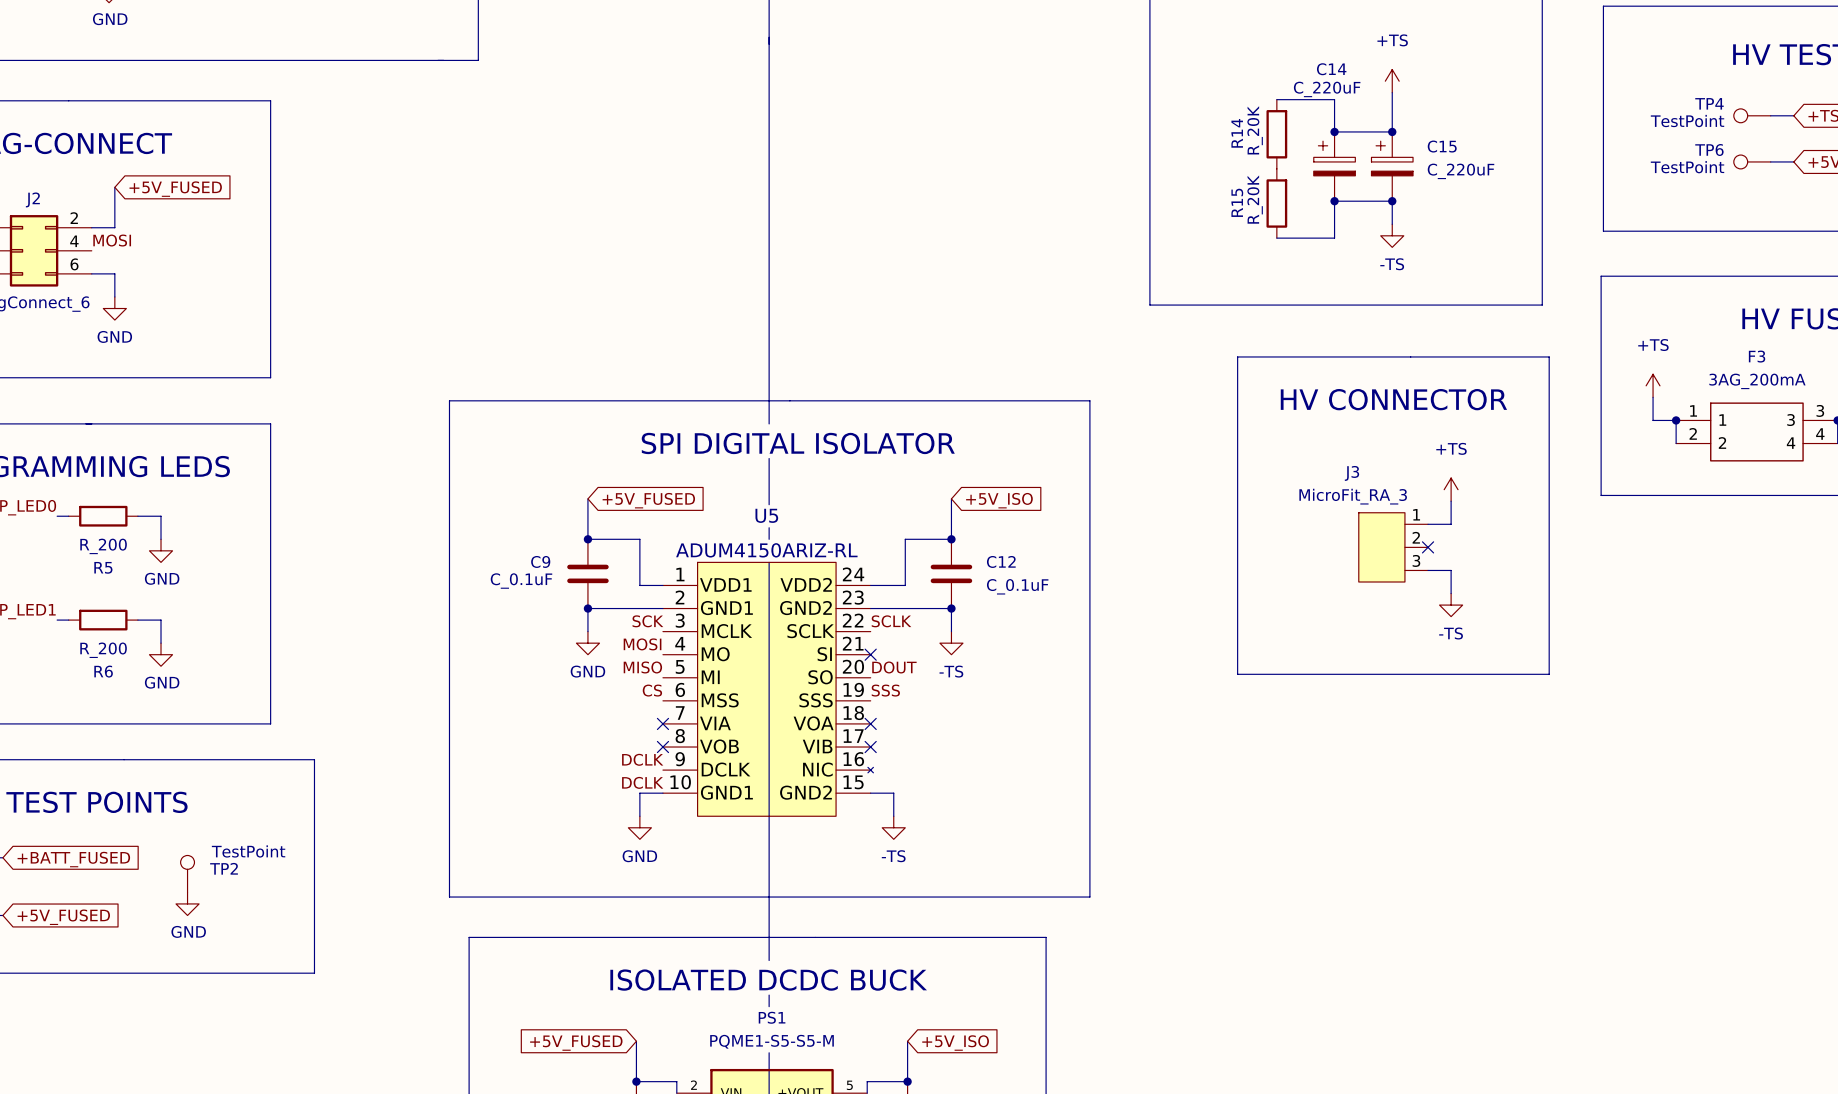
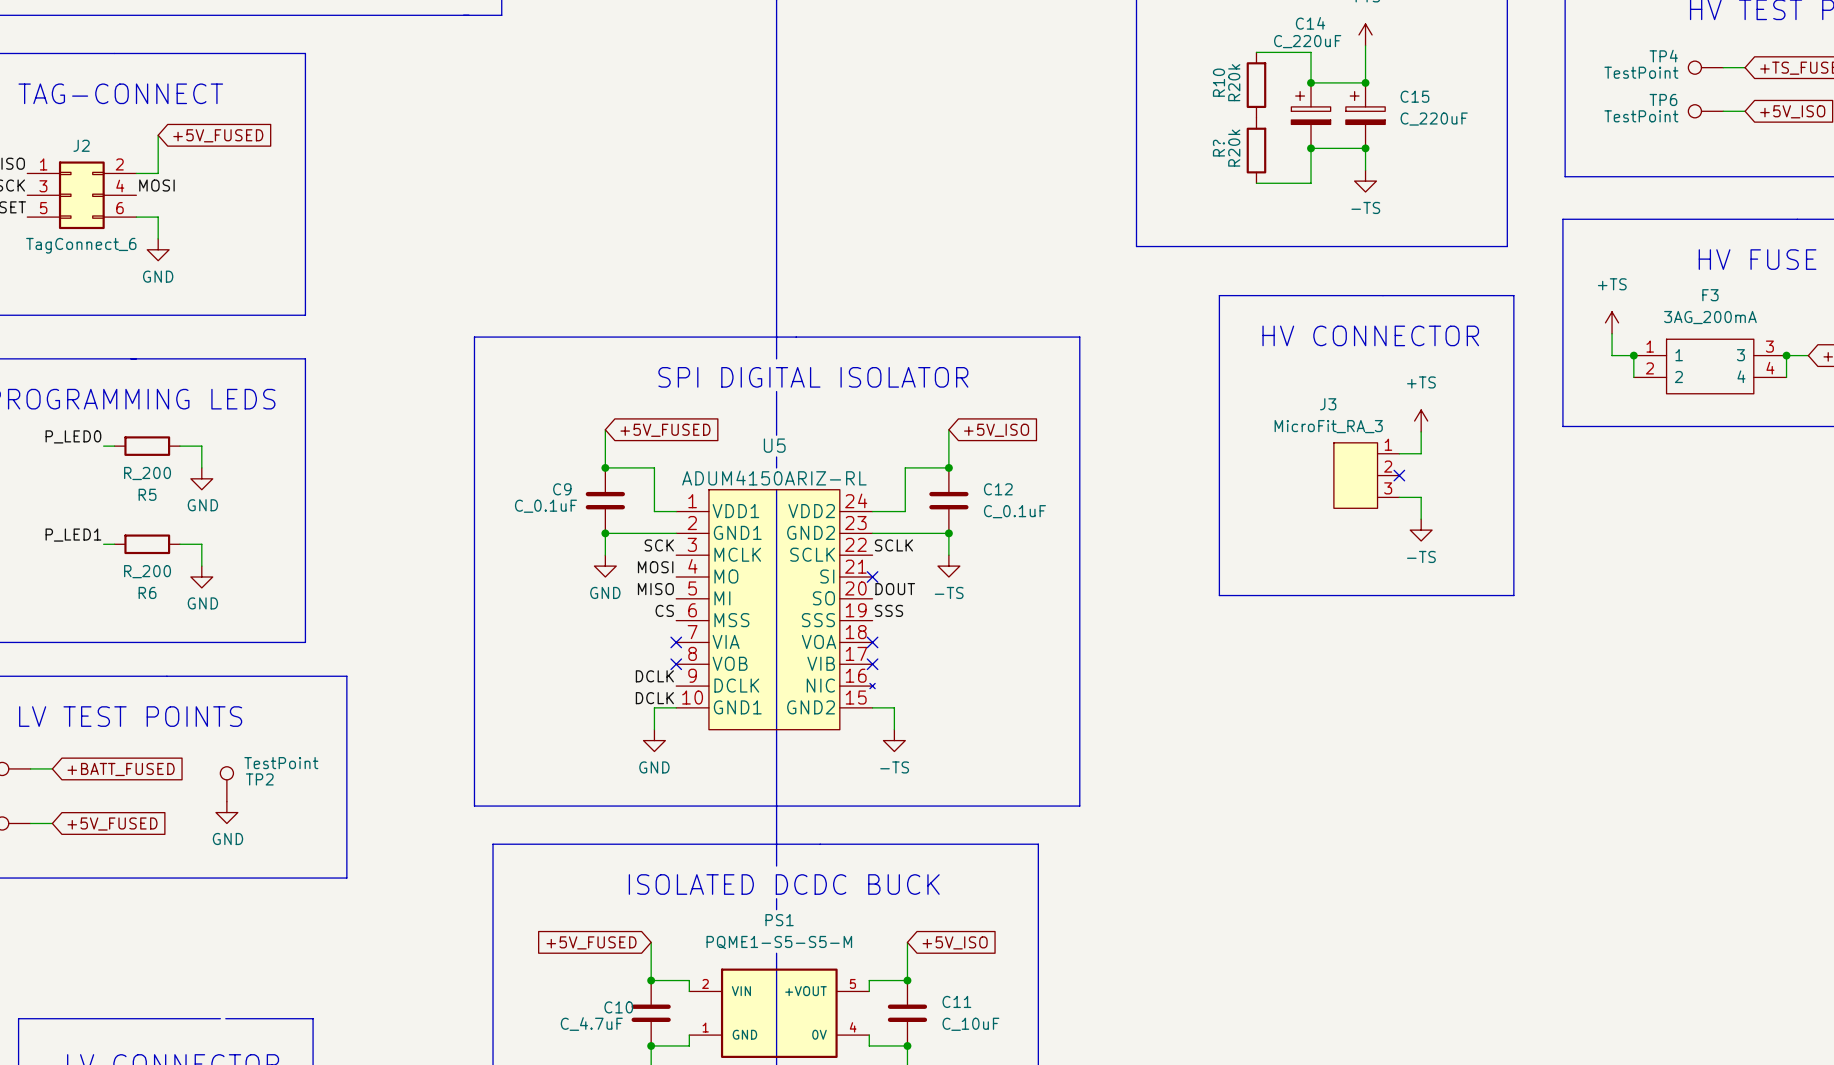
R14 value: R_20K (1255, 130) -> R20k (1234, 82)
R14 name: R14 (1237, 133) -> R10 (1218, 82)
R15 value: R_20K (1255, 199) -> R20k (1234, 148)
R15 name: R15 (1237, 202) -> R? (1218, 148)

